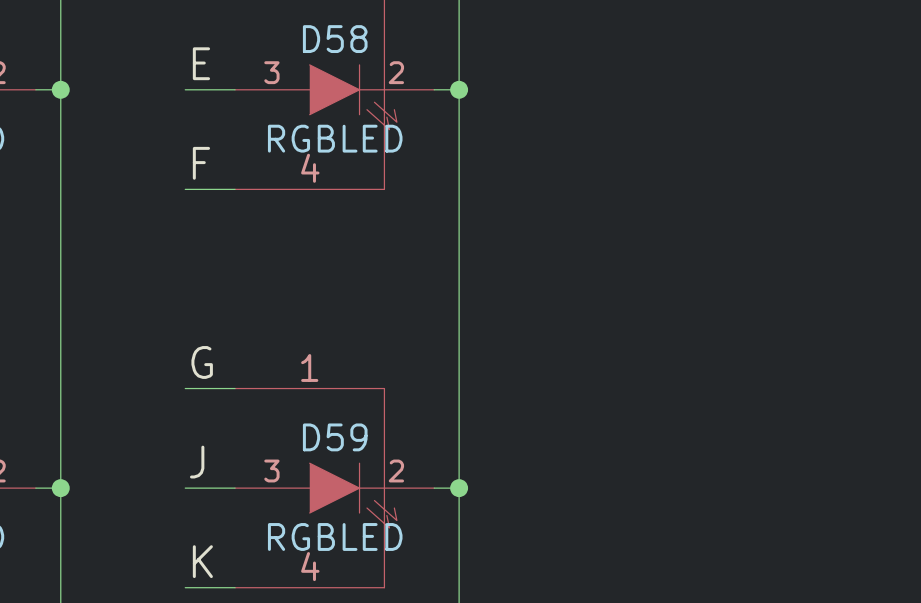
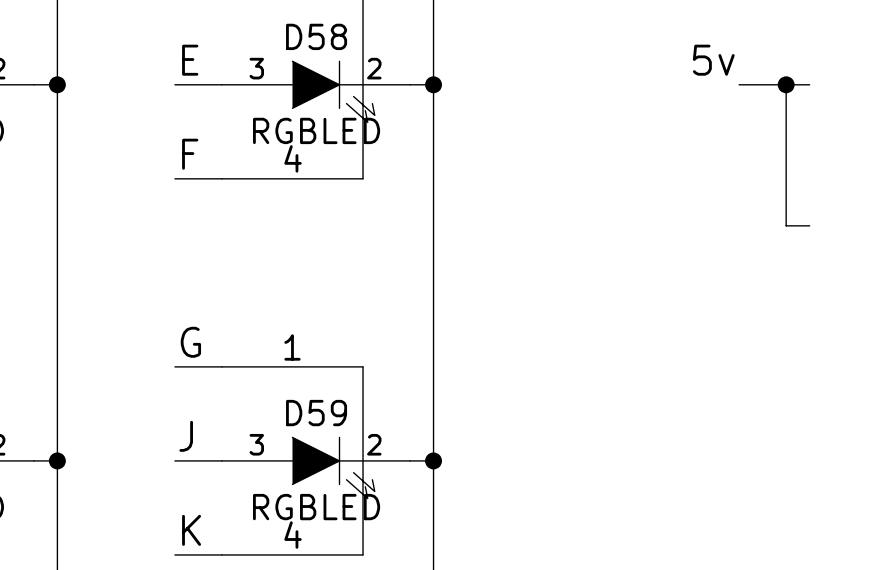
label: none -> 5v (713, 60)
wire: none -> (739, 84) (809, 84)
wire: none -> (786, 84) (786, 225) (809, 225)
junction: none -> (786, 84)

